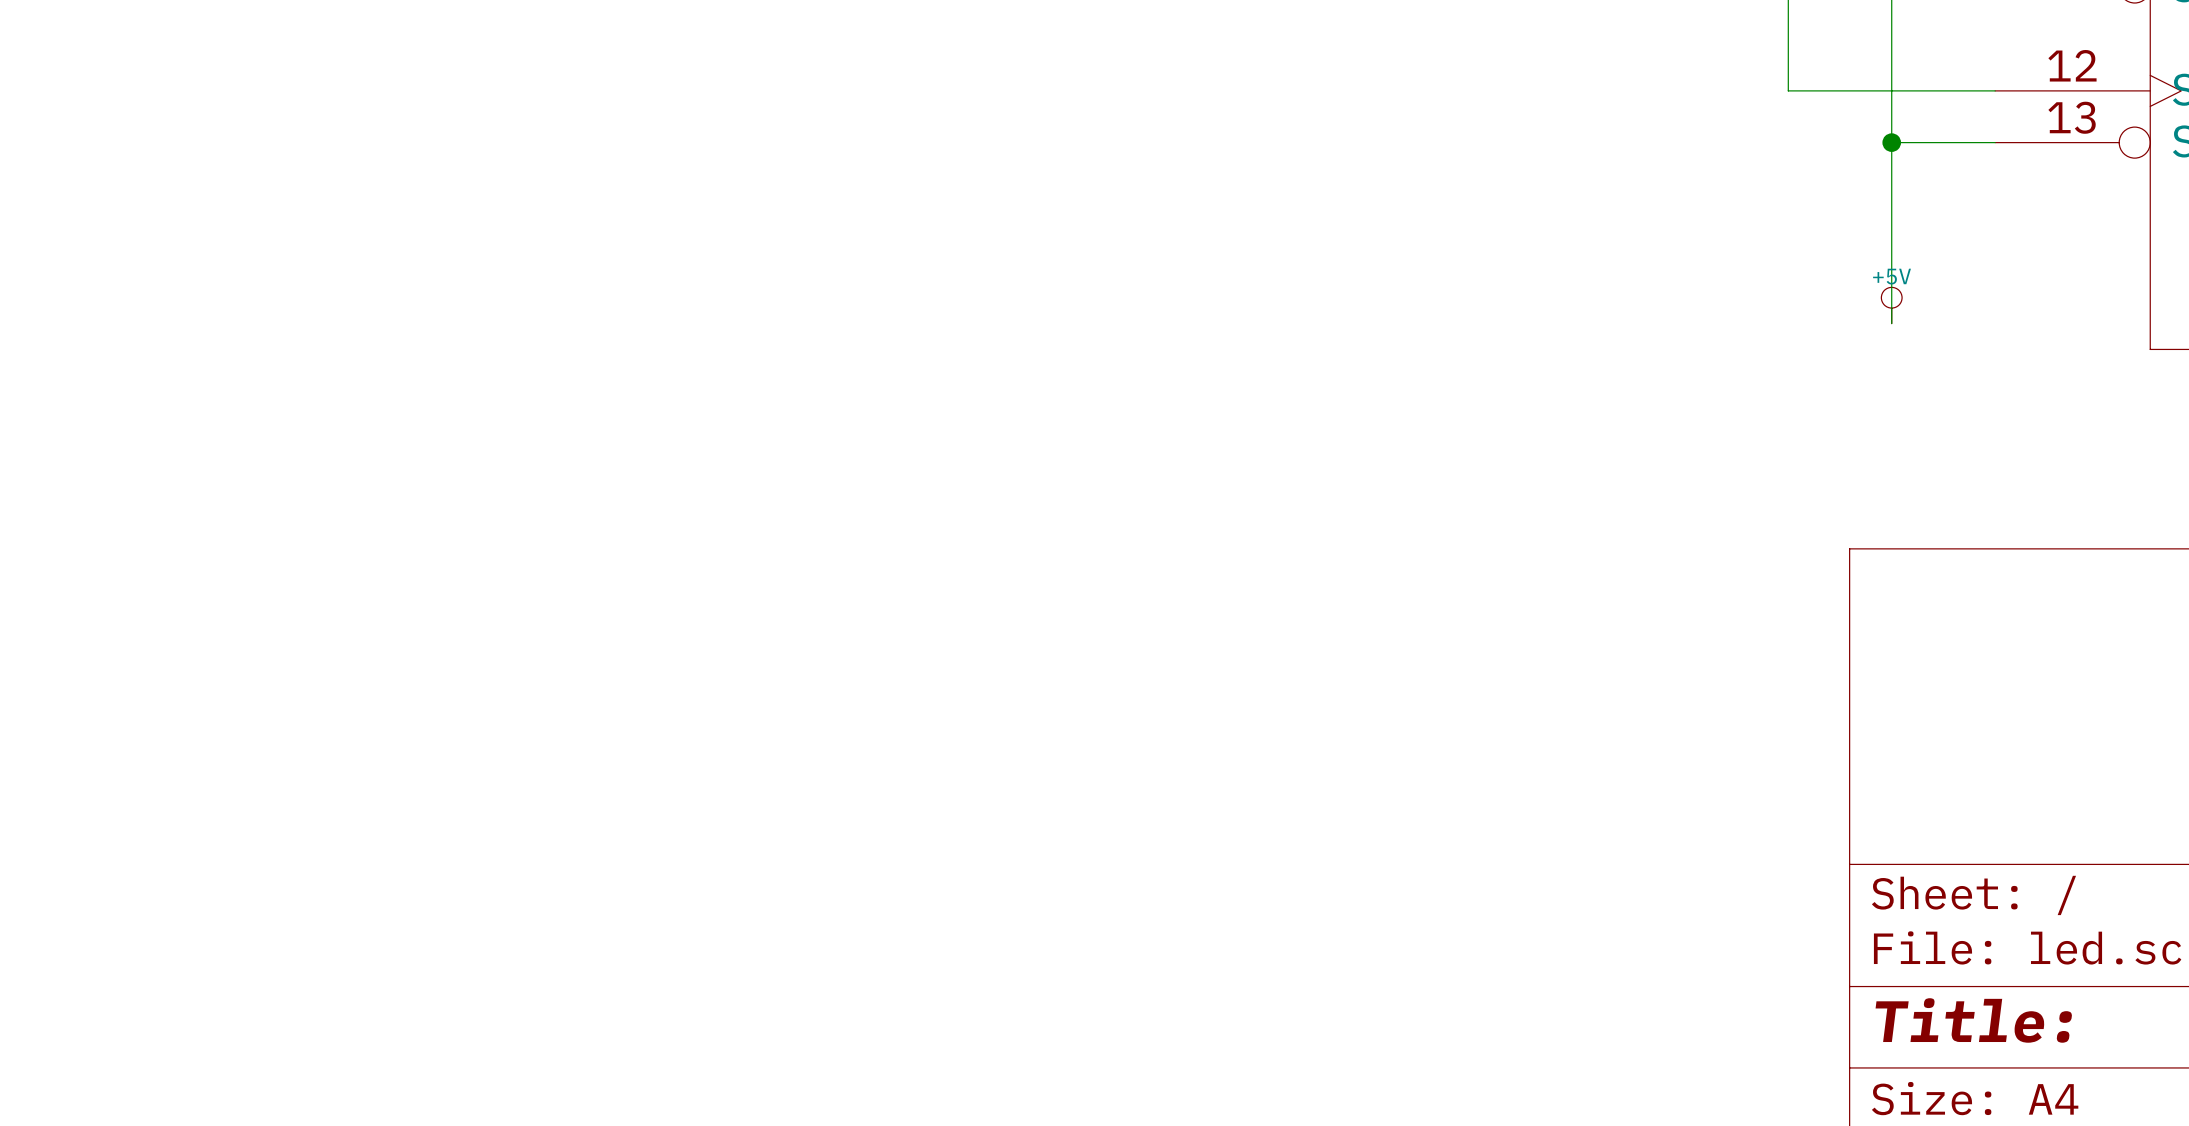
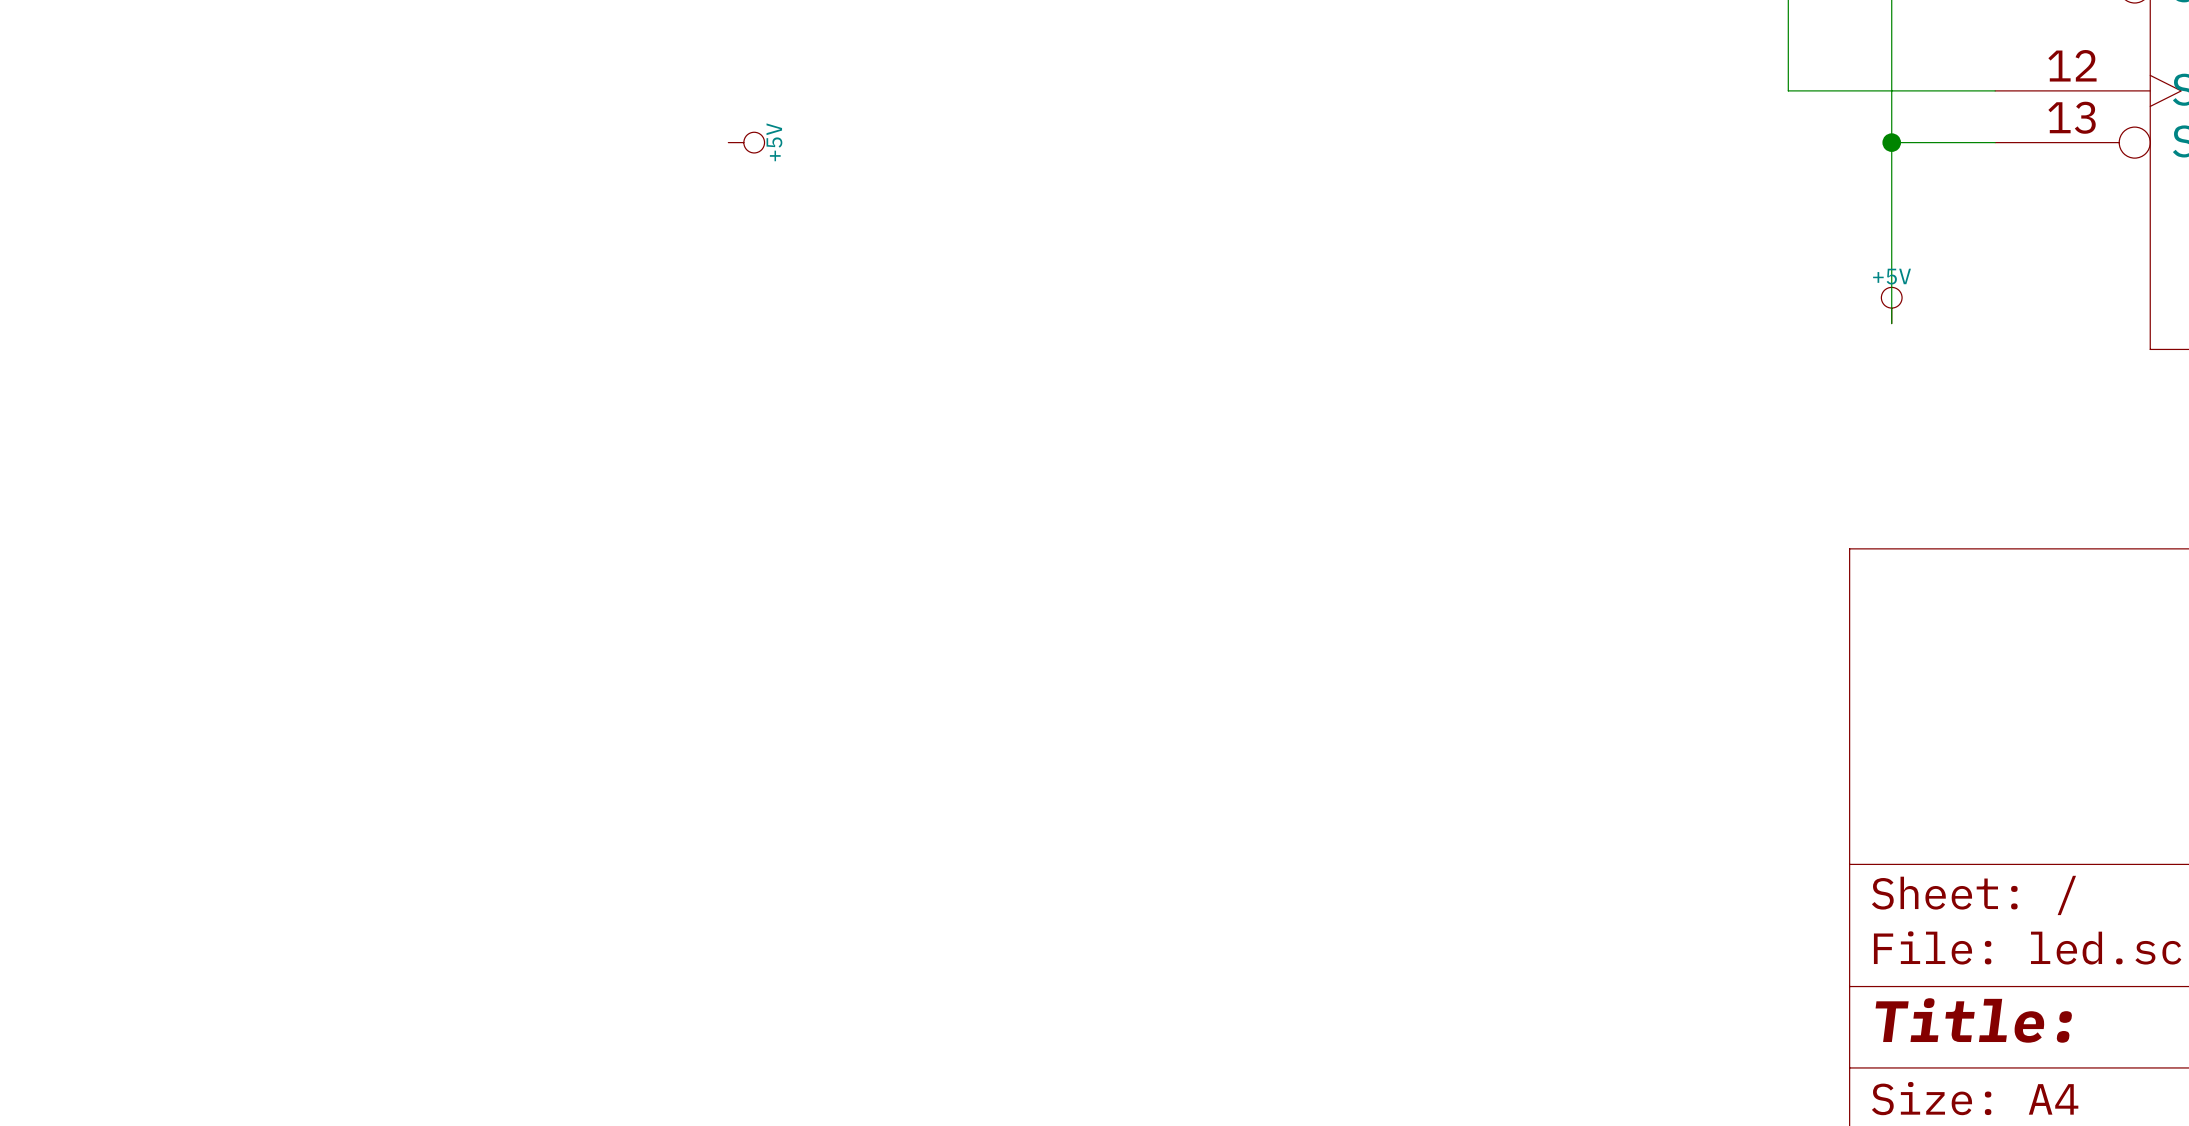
power symbol: none -> +5V (746, 142)

